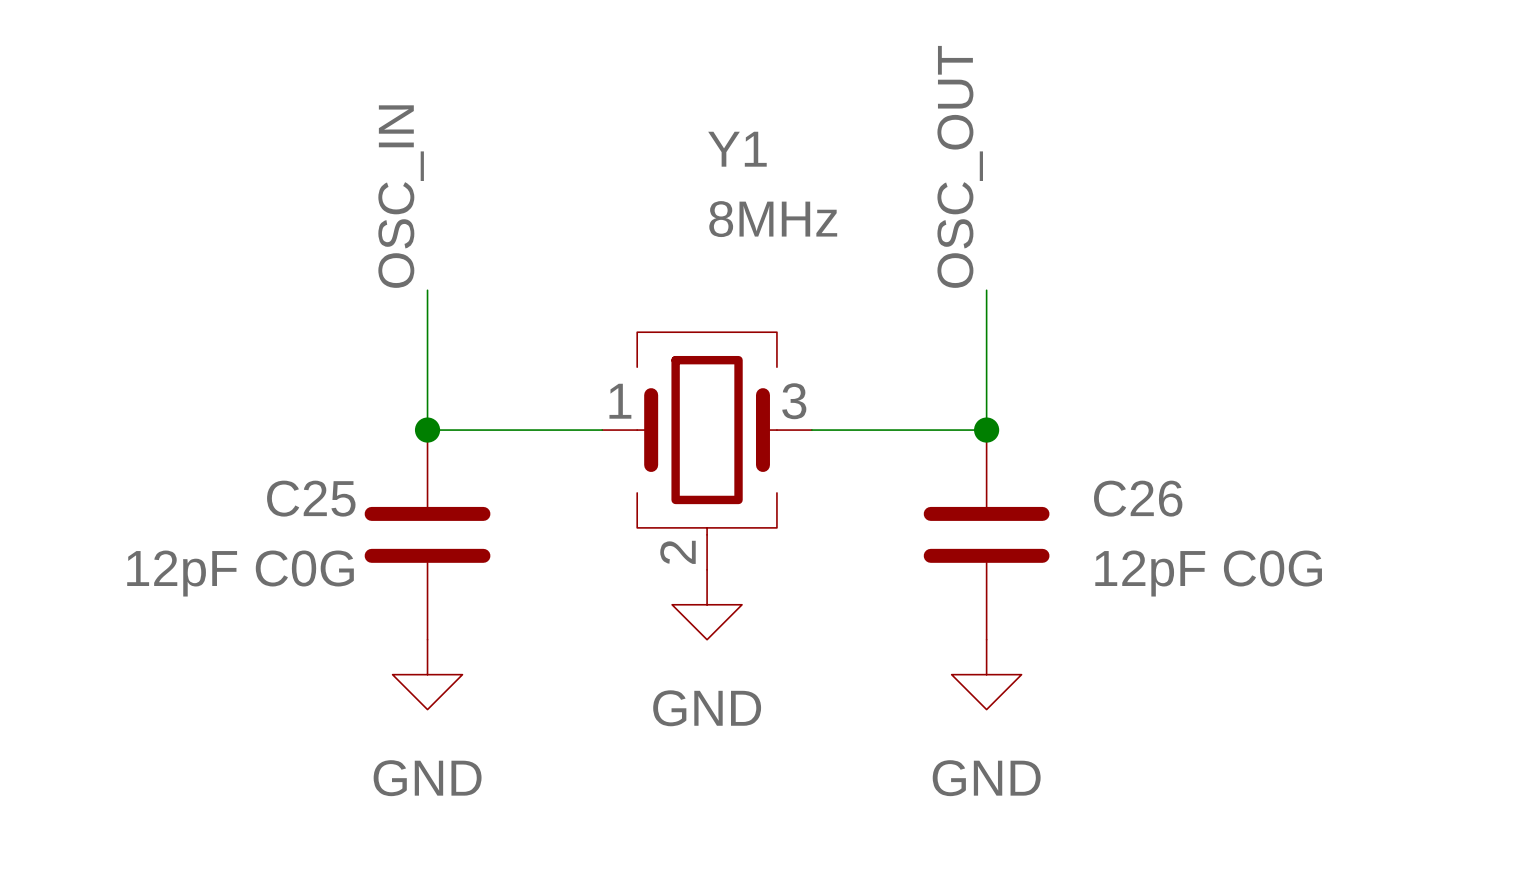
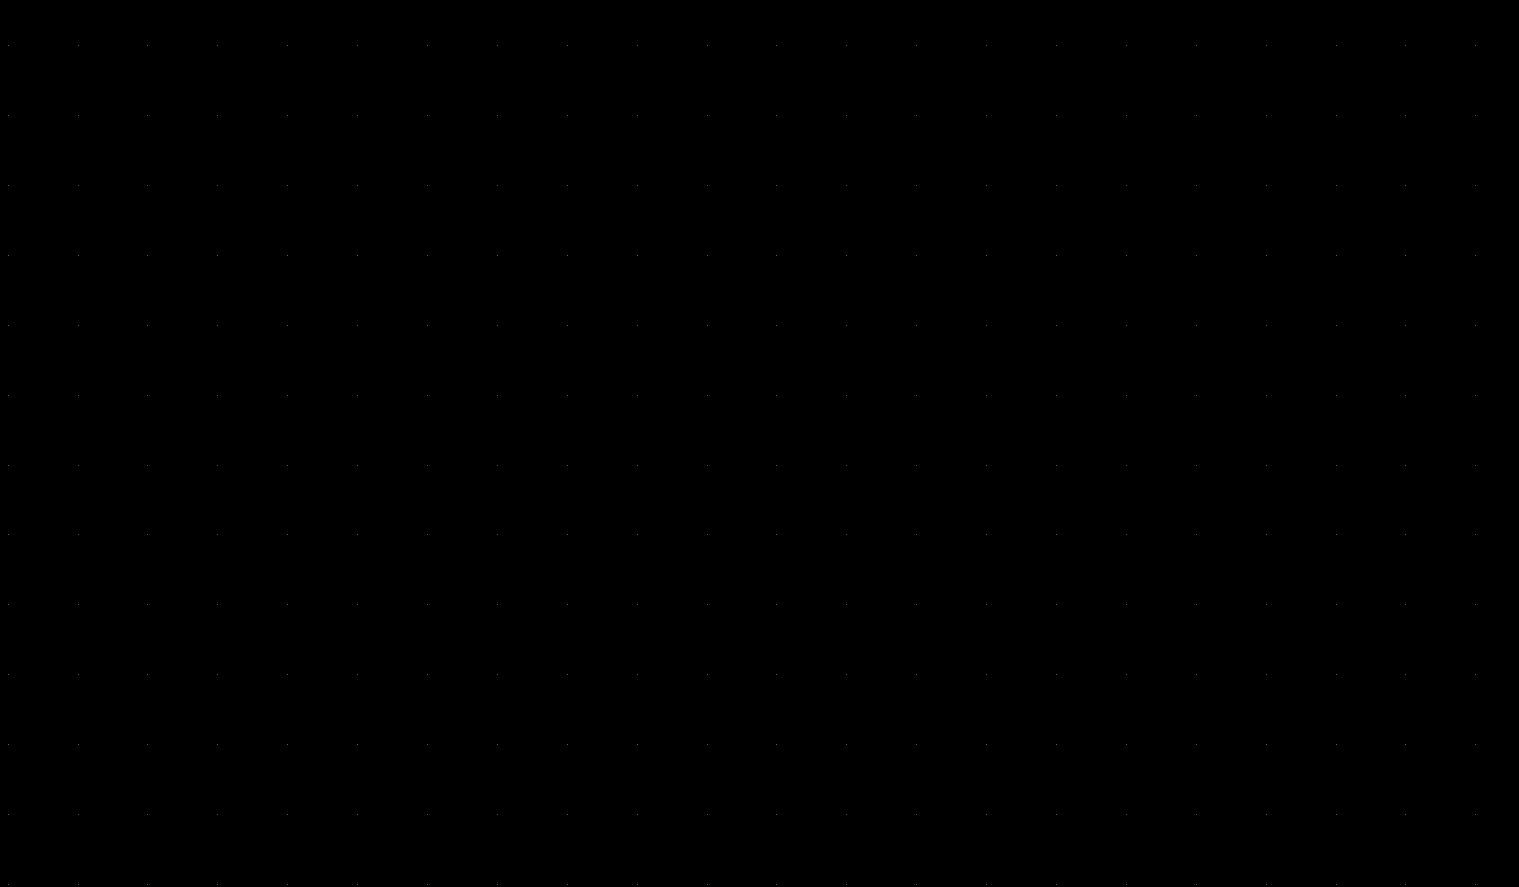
label: OSC_OUT (960, 166) -> none
label: OSC_IN (401, 196) -> none
wire: (427, 290) (427, 430) (602, 430) -> none
wire: (986, 290) (986, 430) (811, 430) -> none
junction: (427, 430) -> none
junction: (986, 430) -> none
Y1: 8MHz (707, 451) -> none
C25: 12pF C0G (427, 534) -> none
C26: 12pF C0G (986, 534) -> none
power symbol: GND (707, 604) -> none
power symbol: GND (427, 674) -> none
power symbol: GND (986, 674) -> none

